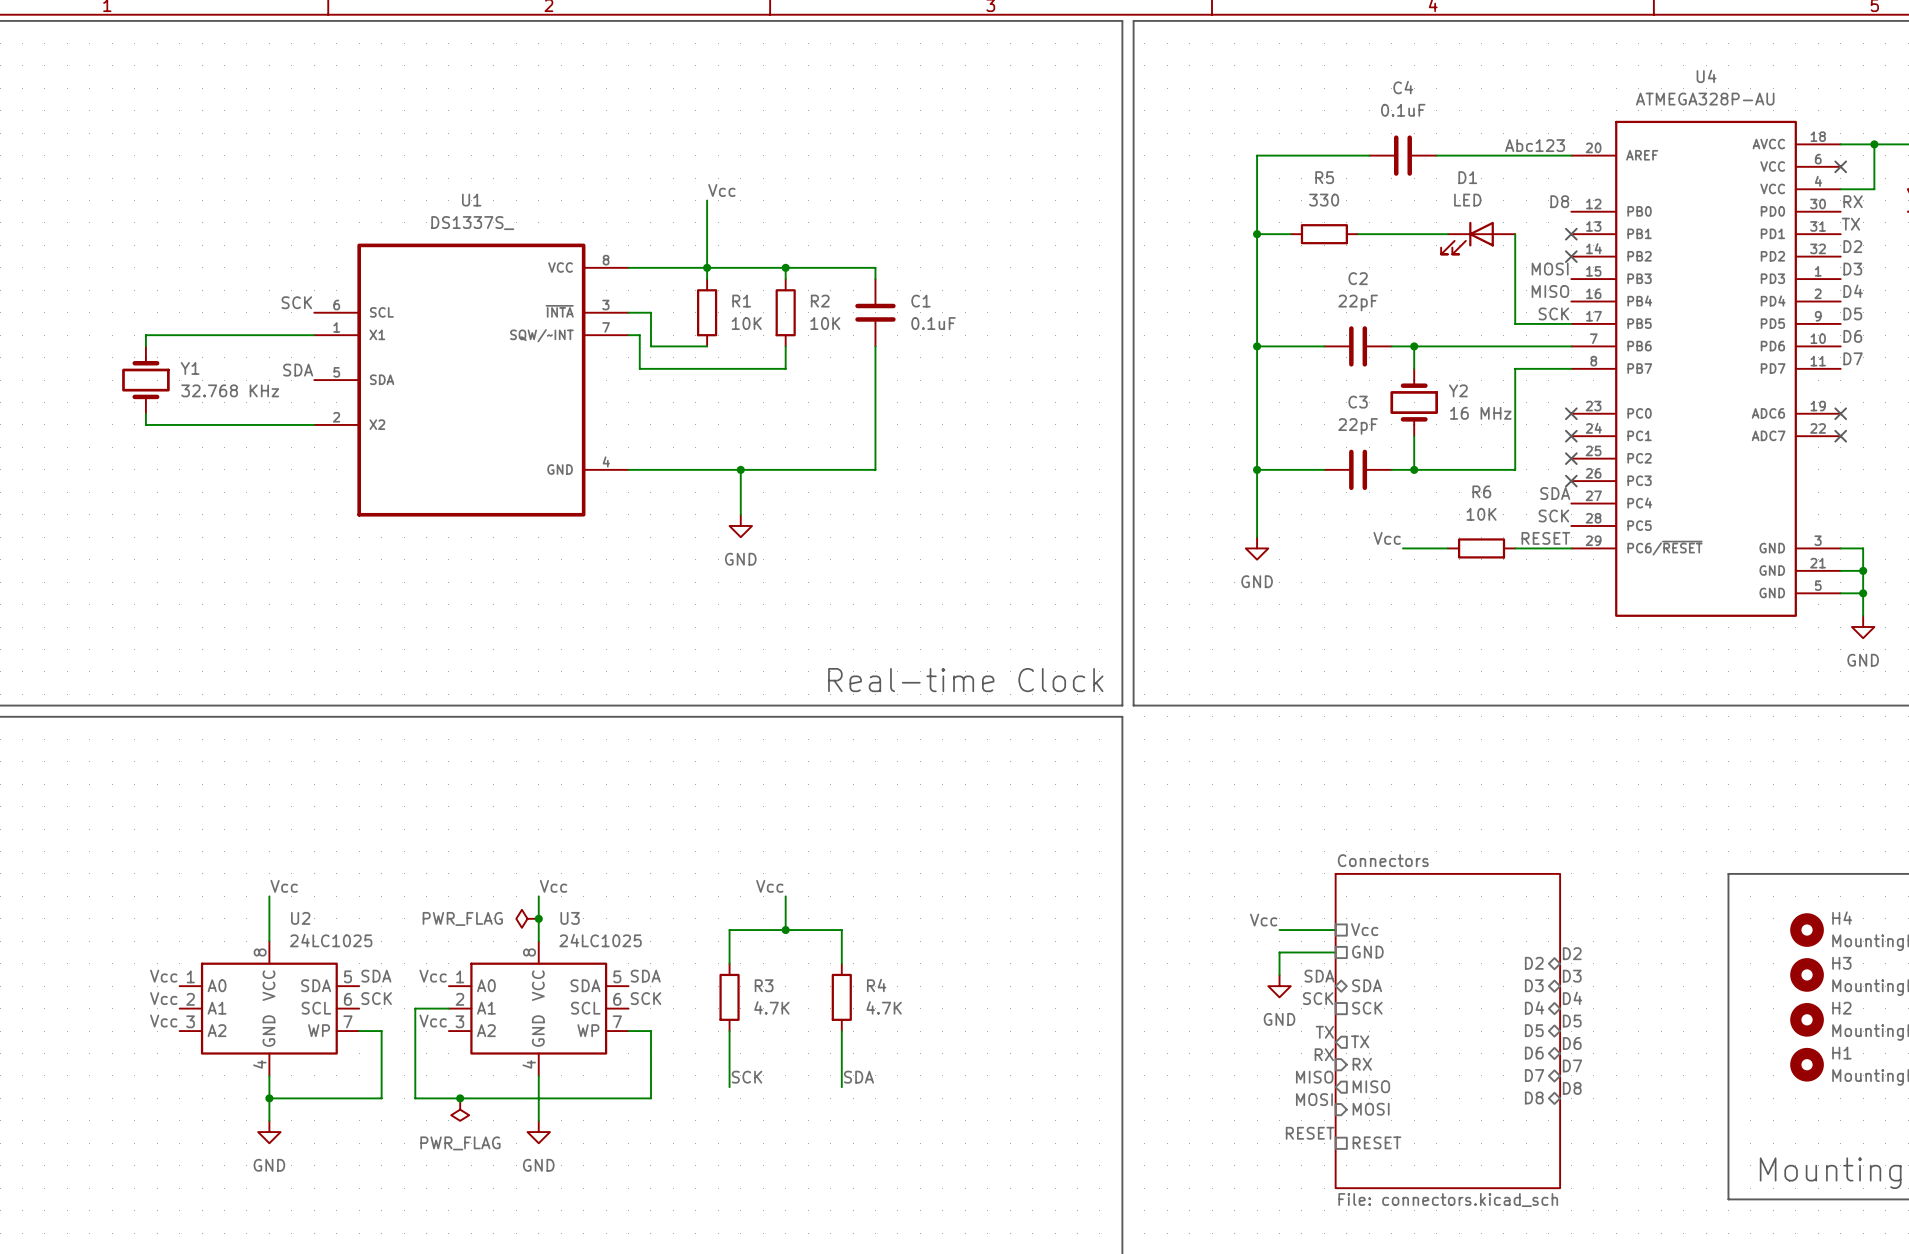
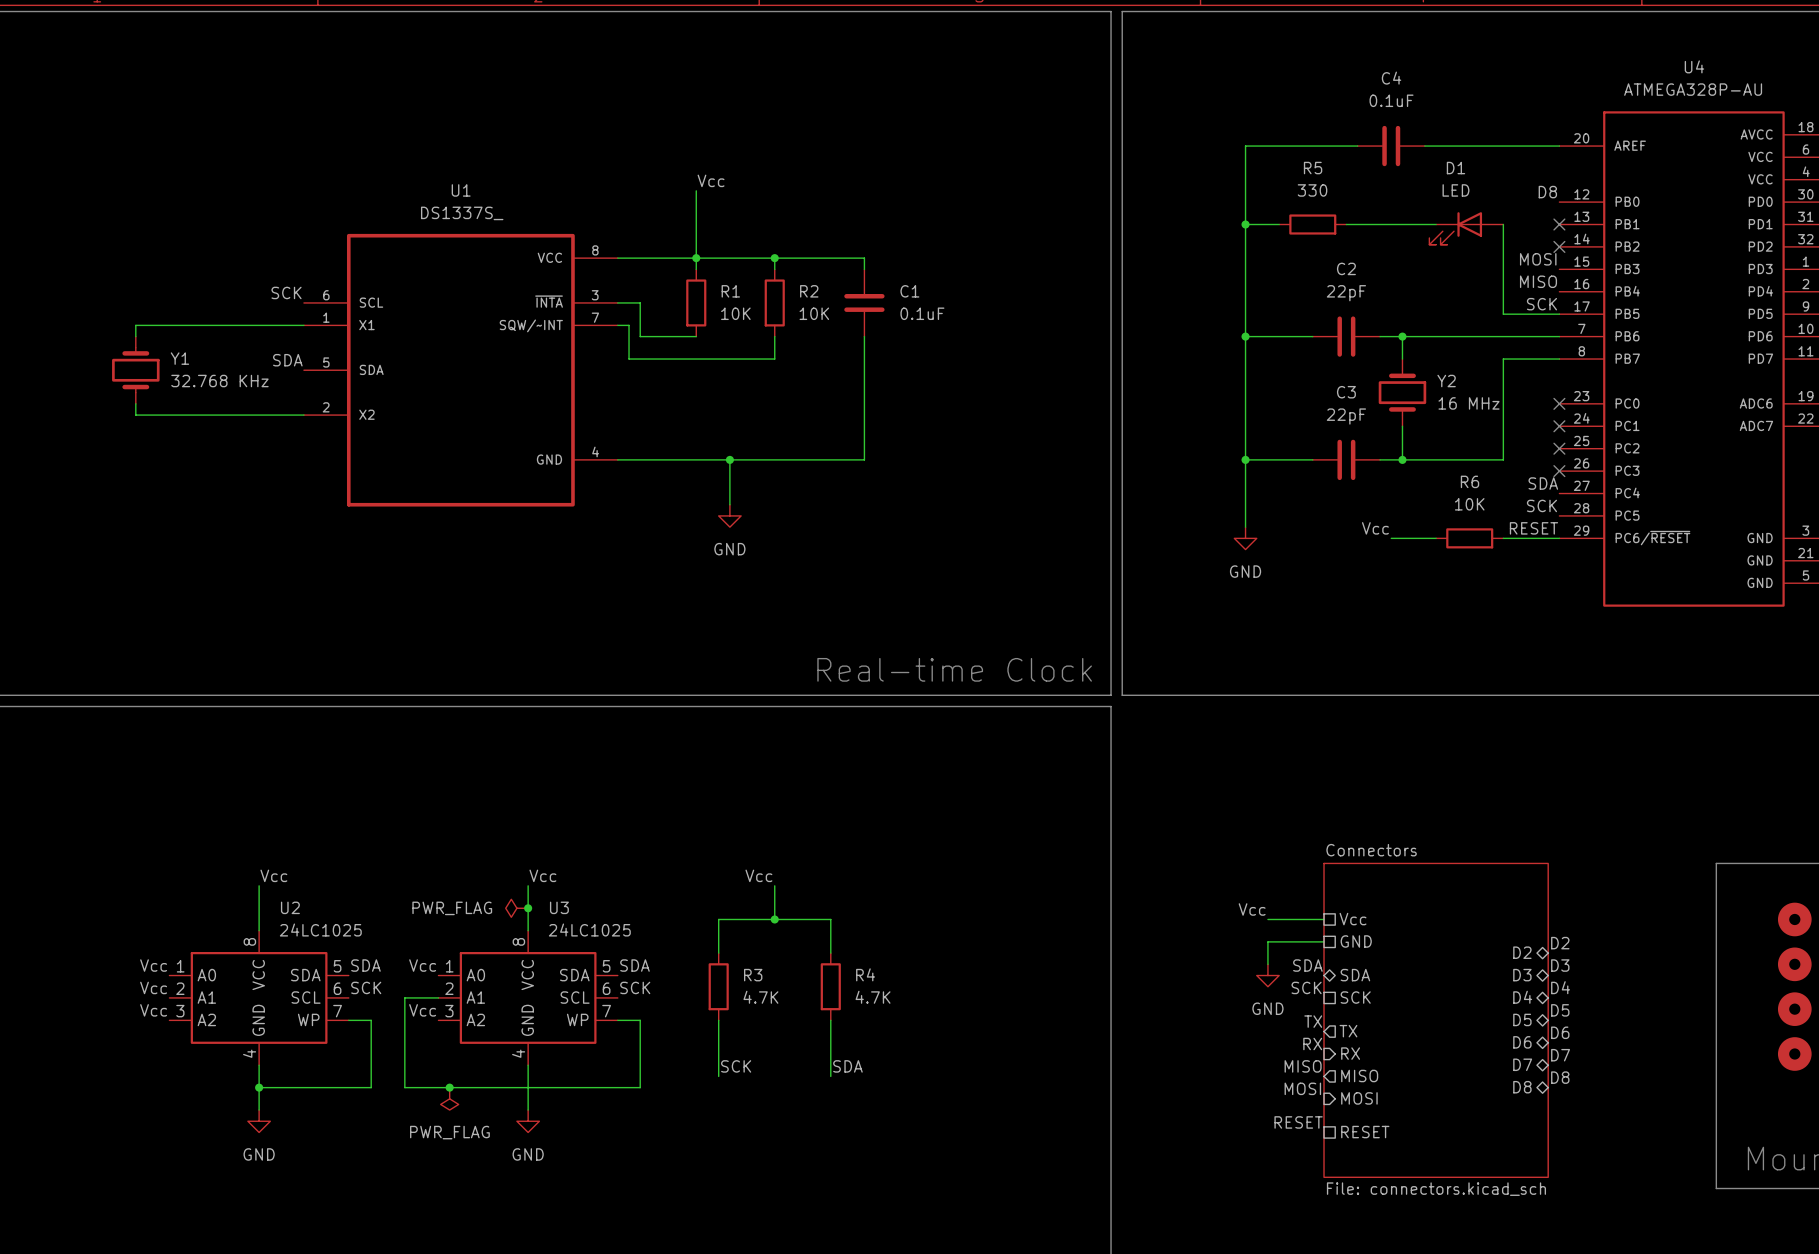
label: Abc123 (1535, 145) -> none

